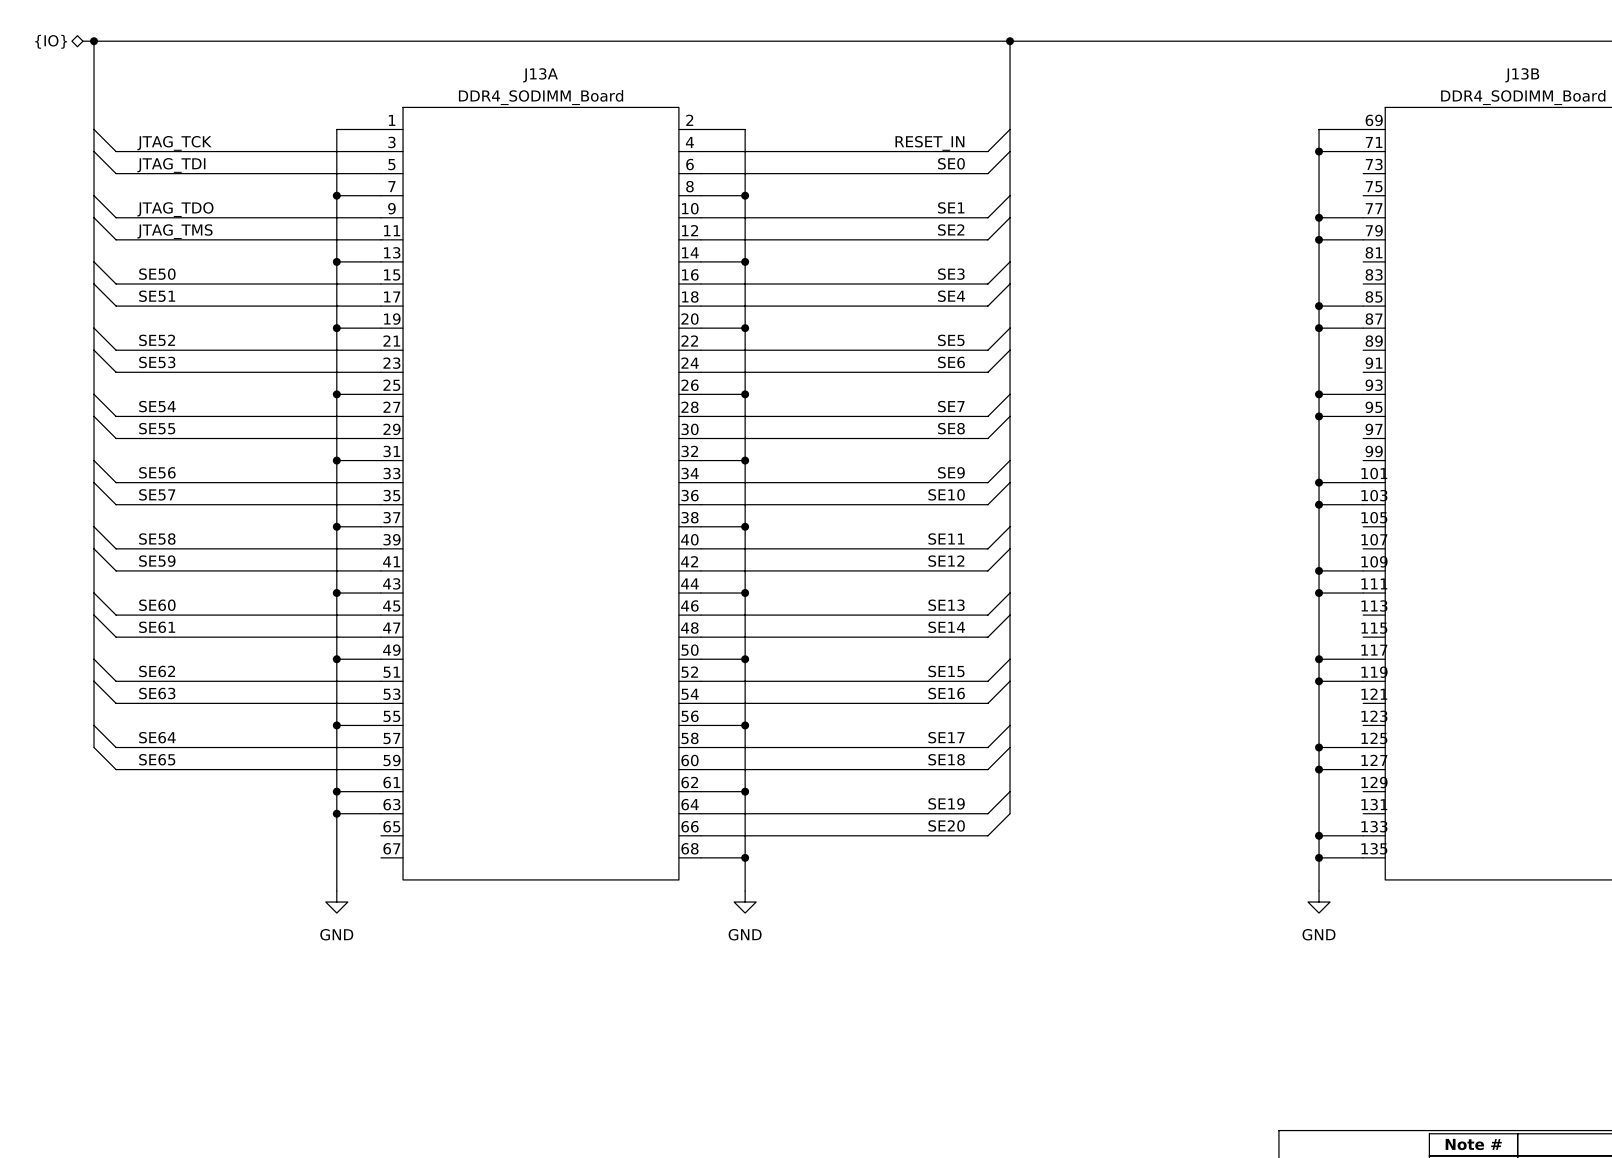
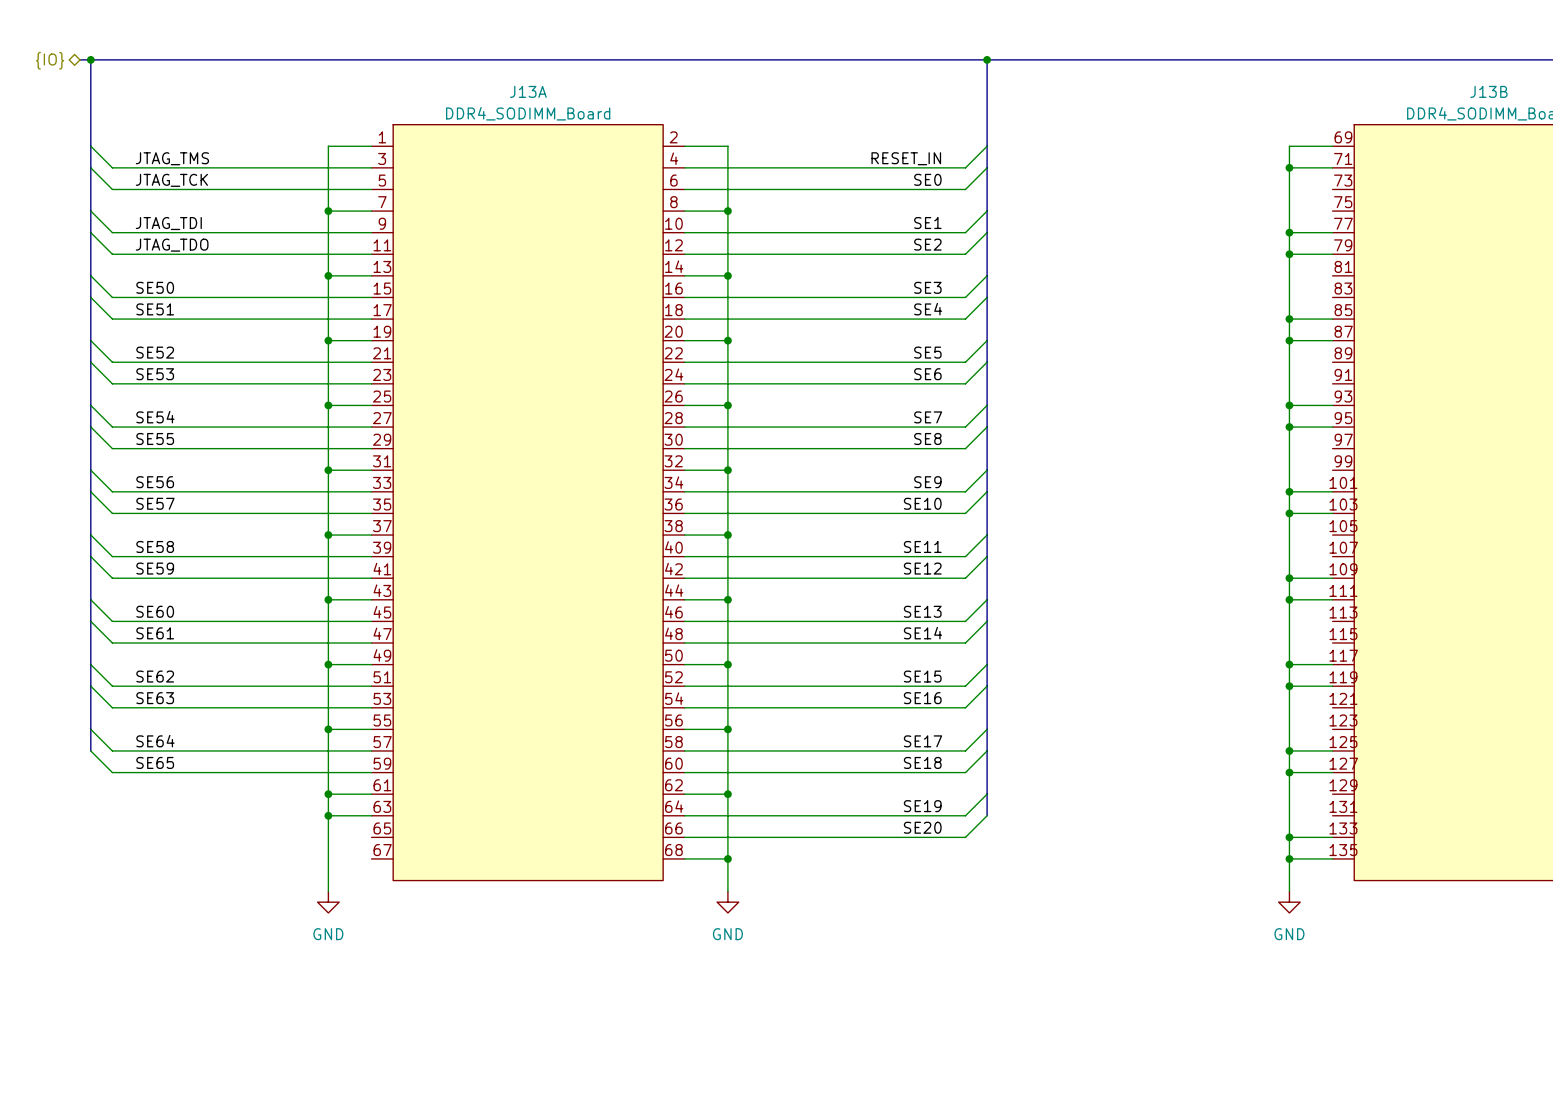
label: JTAG_TCK (174, 143) -> JTAG_TMS (172, 158)
label: JTAG_TDI (171, 165) -> JTAG_TCK (171, 180)
label: JTAG_TDO (175, 209) -> JTAG_TDI (168, 223)
label: JTAG_TMS (174, 231) -> JTAG_TDO (172, 245)

